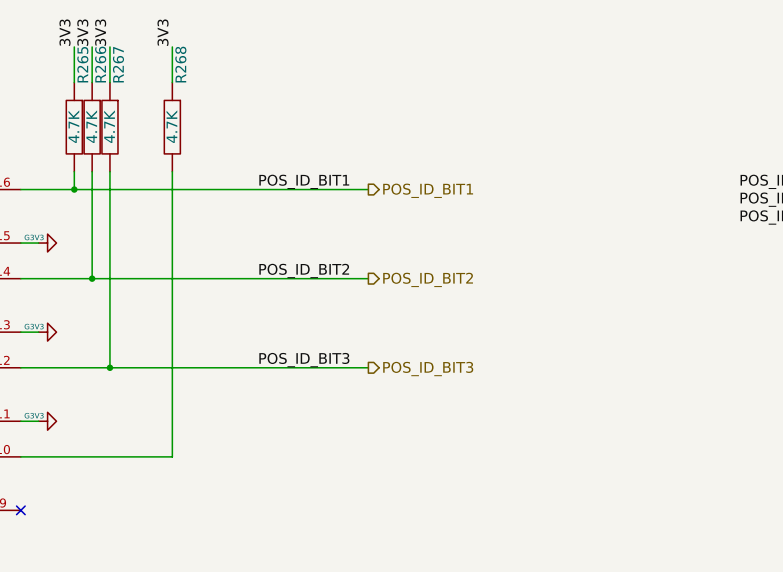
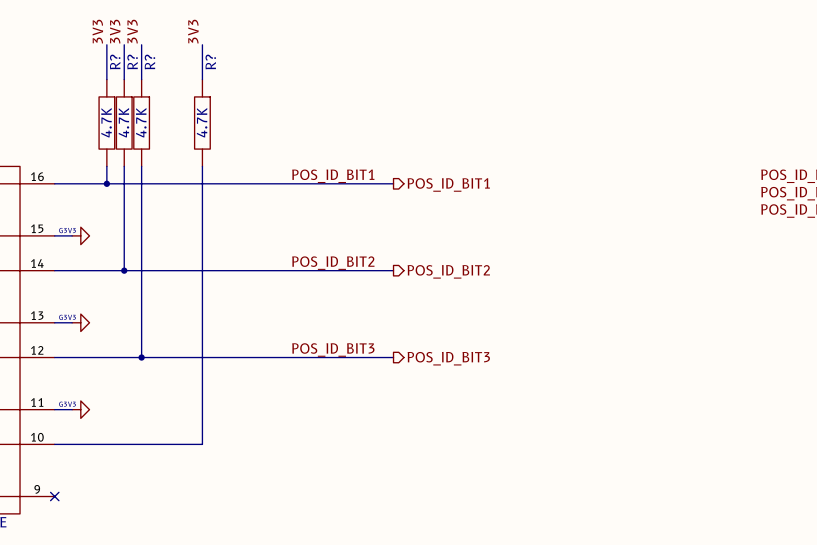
R265 name: R265 (82, 64) -> R? (115, 62)
R266 name: R266 (100, 64) -> R? (132, 62)
R267 name: R267 (118, 64) -> R? (149, 62)
R268 name: R268 (180, 64) -> R? (210, 62)

